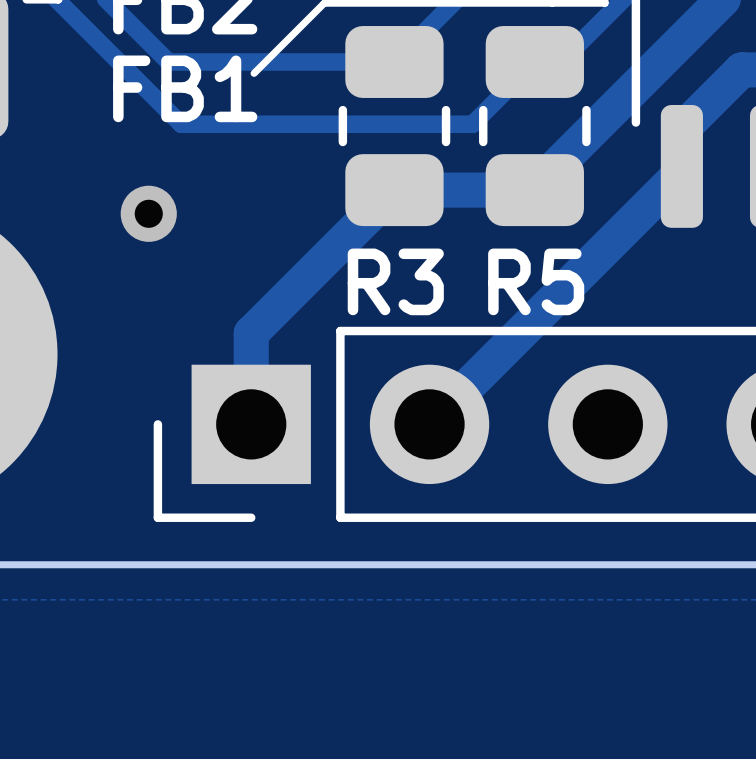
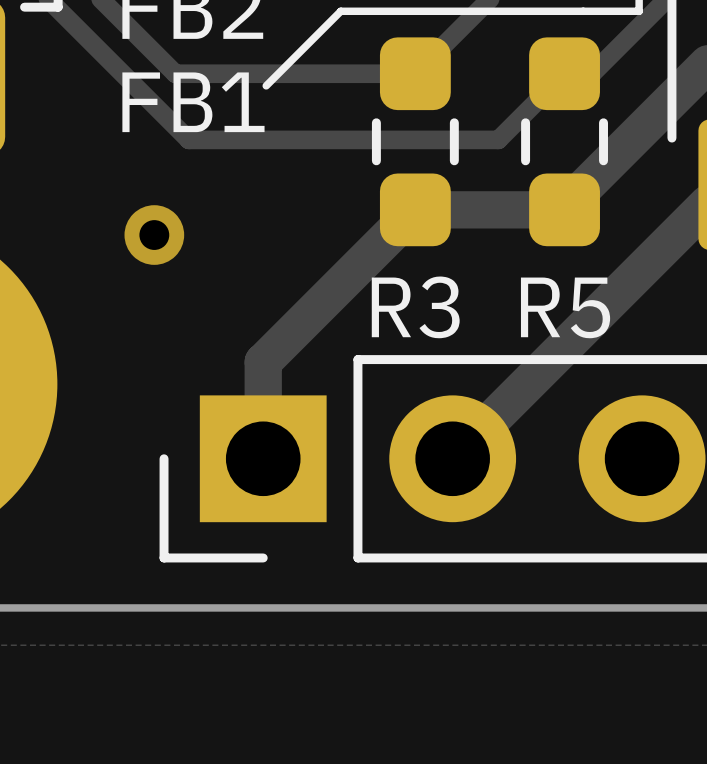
R3 footprint: [338, 26, 451, 227] -> [371, 37, 459, 247]
R5 footprint: [479, 26, 591, 227] -> [521, 37, 608, 247]

